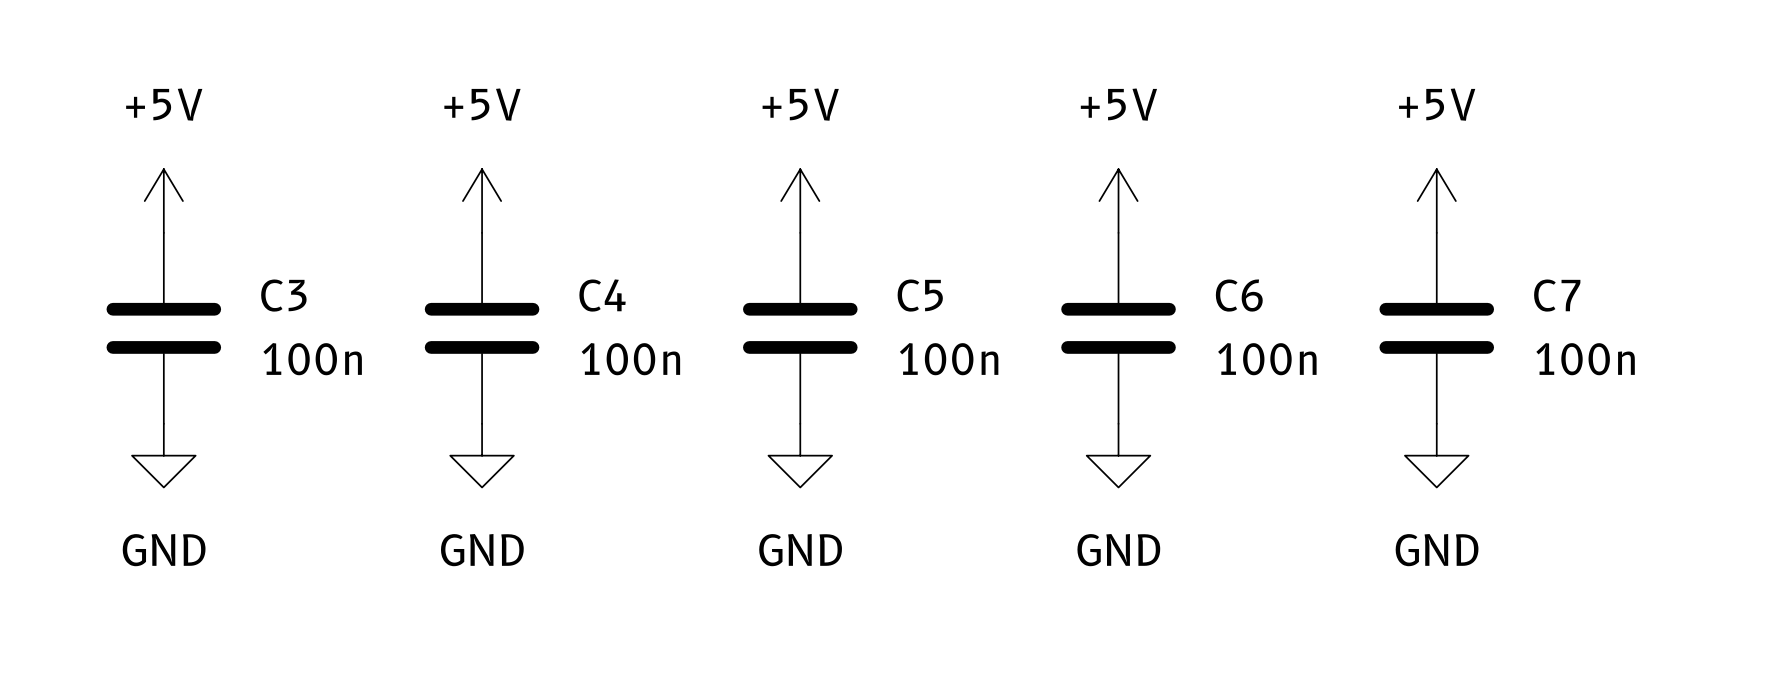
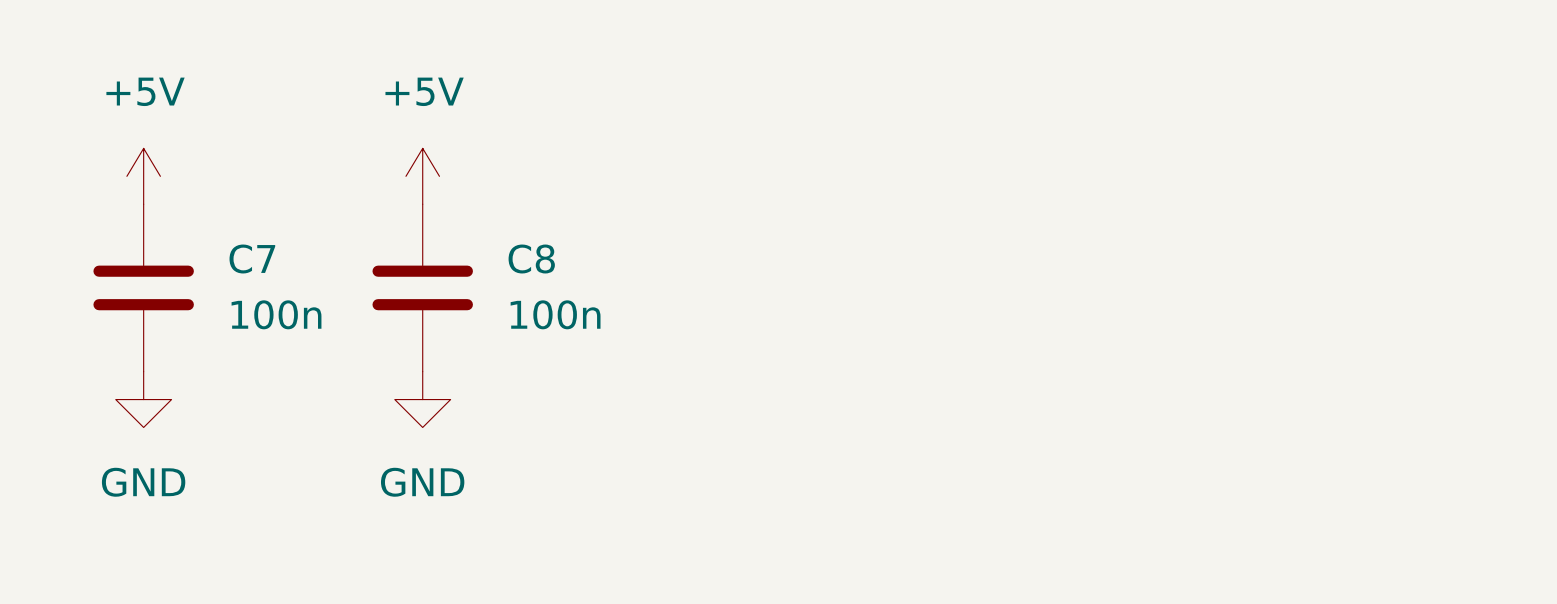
power symbol: +5V (800, 201) -> none
power symbol: +5V (1118, 201) -> none
power symbol: +5V (1436, 201) -> none
C3 name: C3 (283, 295) -> C7 (252, 259)
C4 name: C4 (602, 295) -> C8 (531, 259)
C5: 100n (800, 328) -> none
C6: 100n (1118, 328) -> none
C7: 100n (1436, 328) -> none
power symbol: GND (800, 455) -> none
power symbol: GND (1118, 455) -> none
power symbol: GND (1436, 455) -> none

